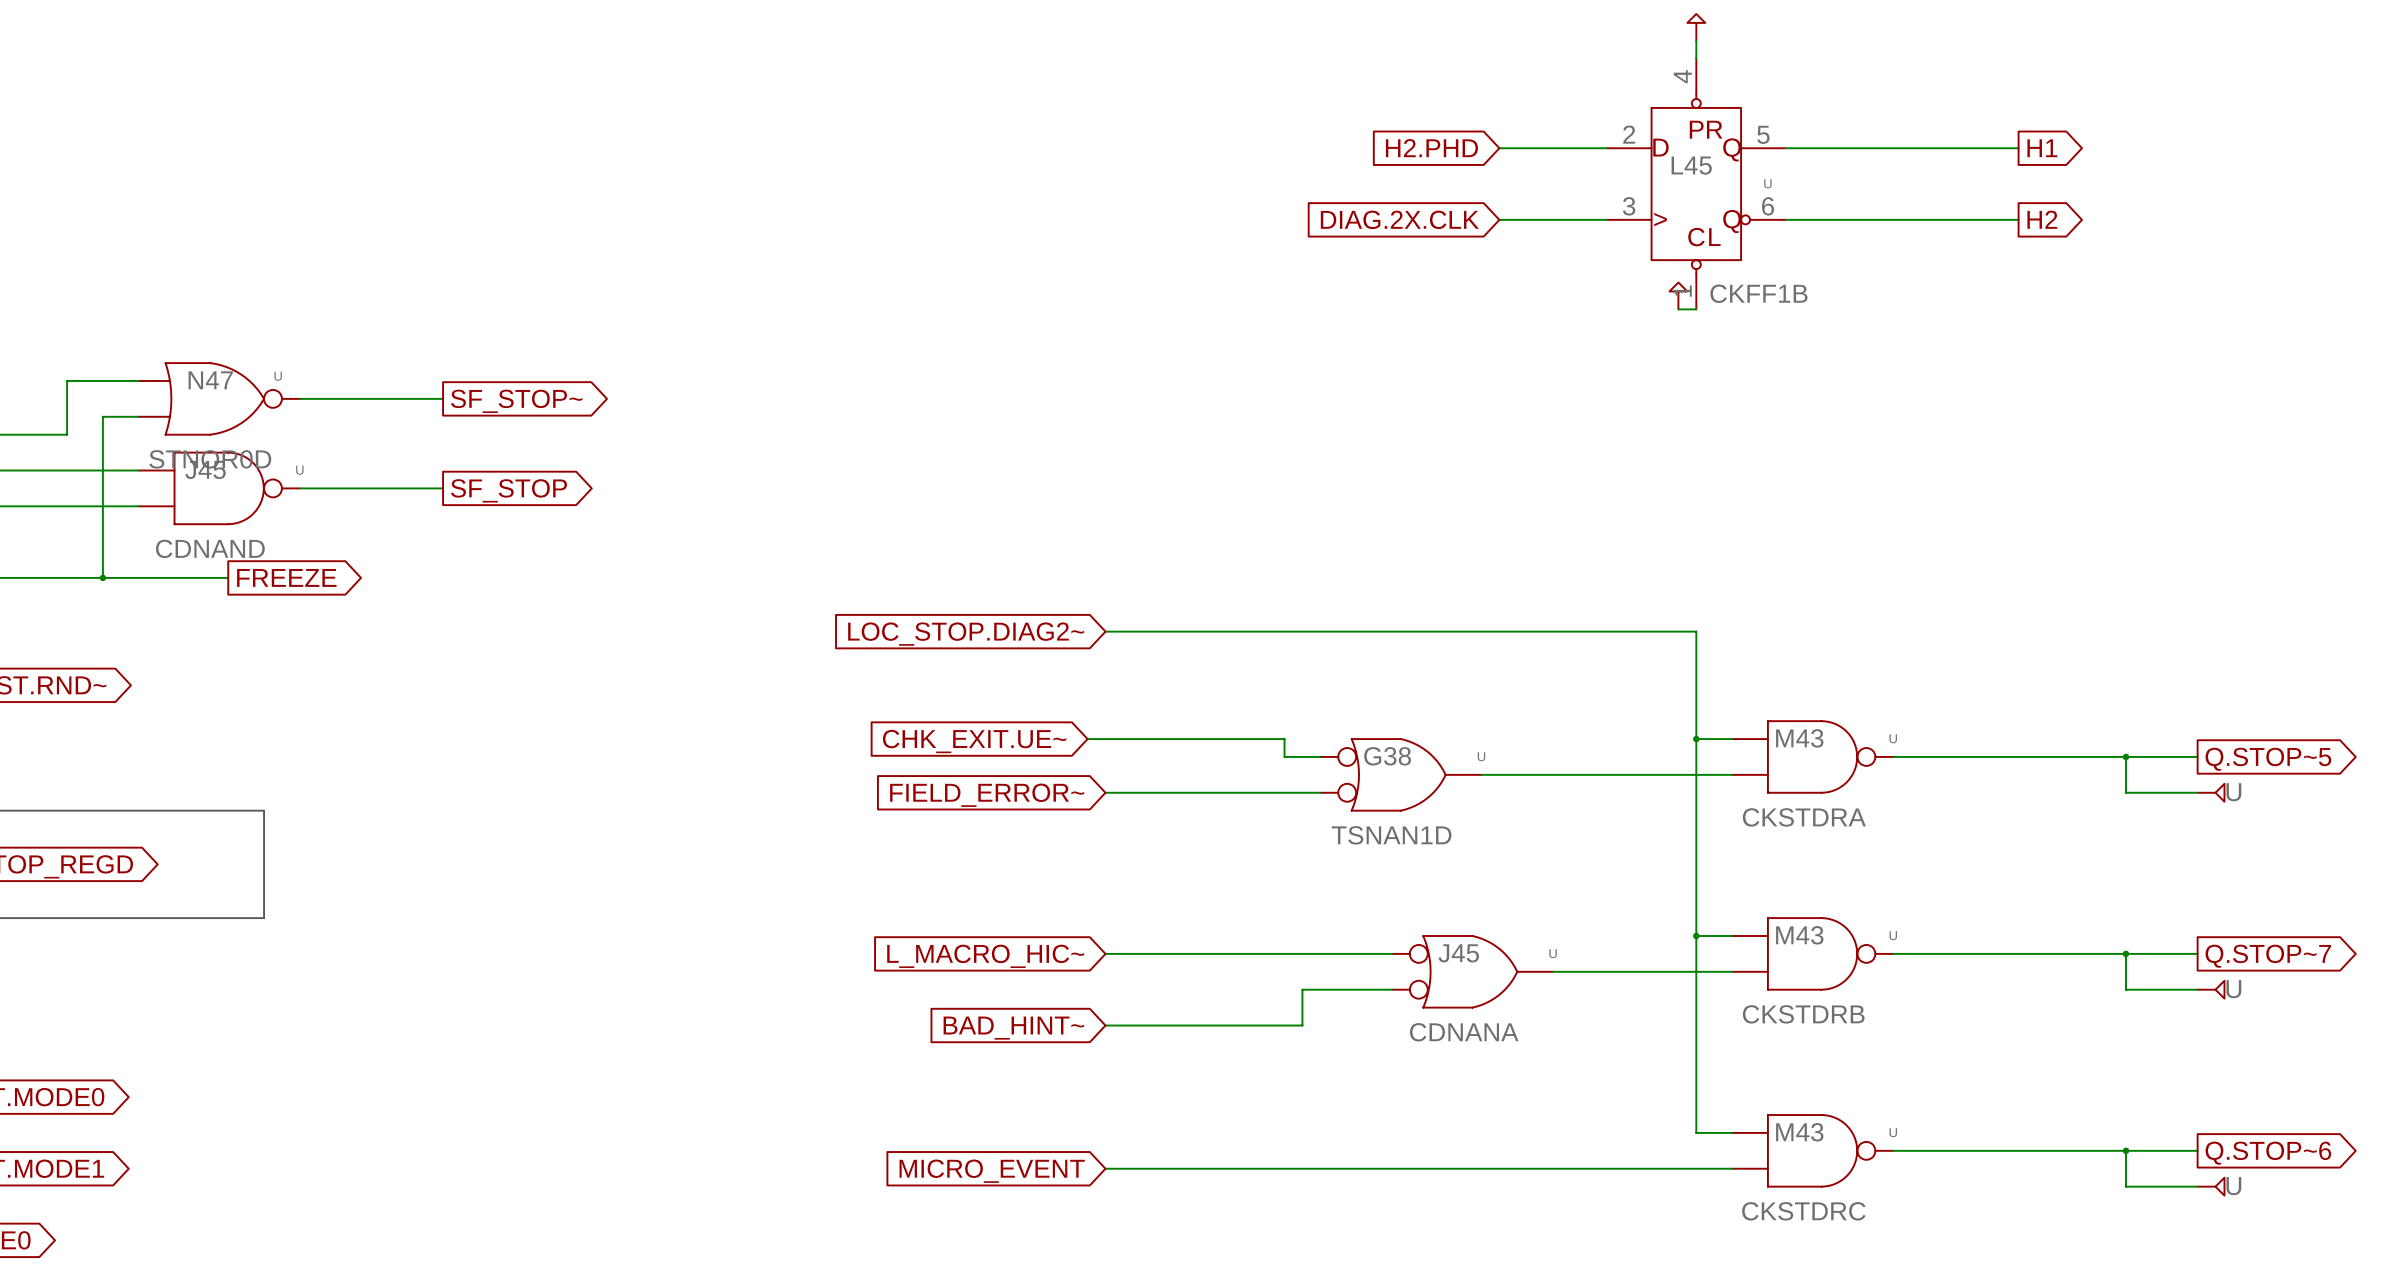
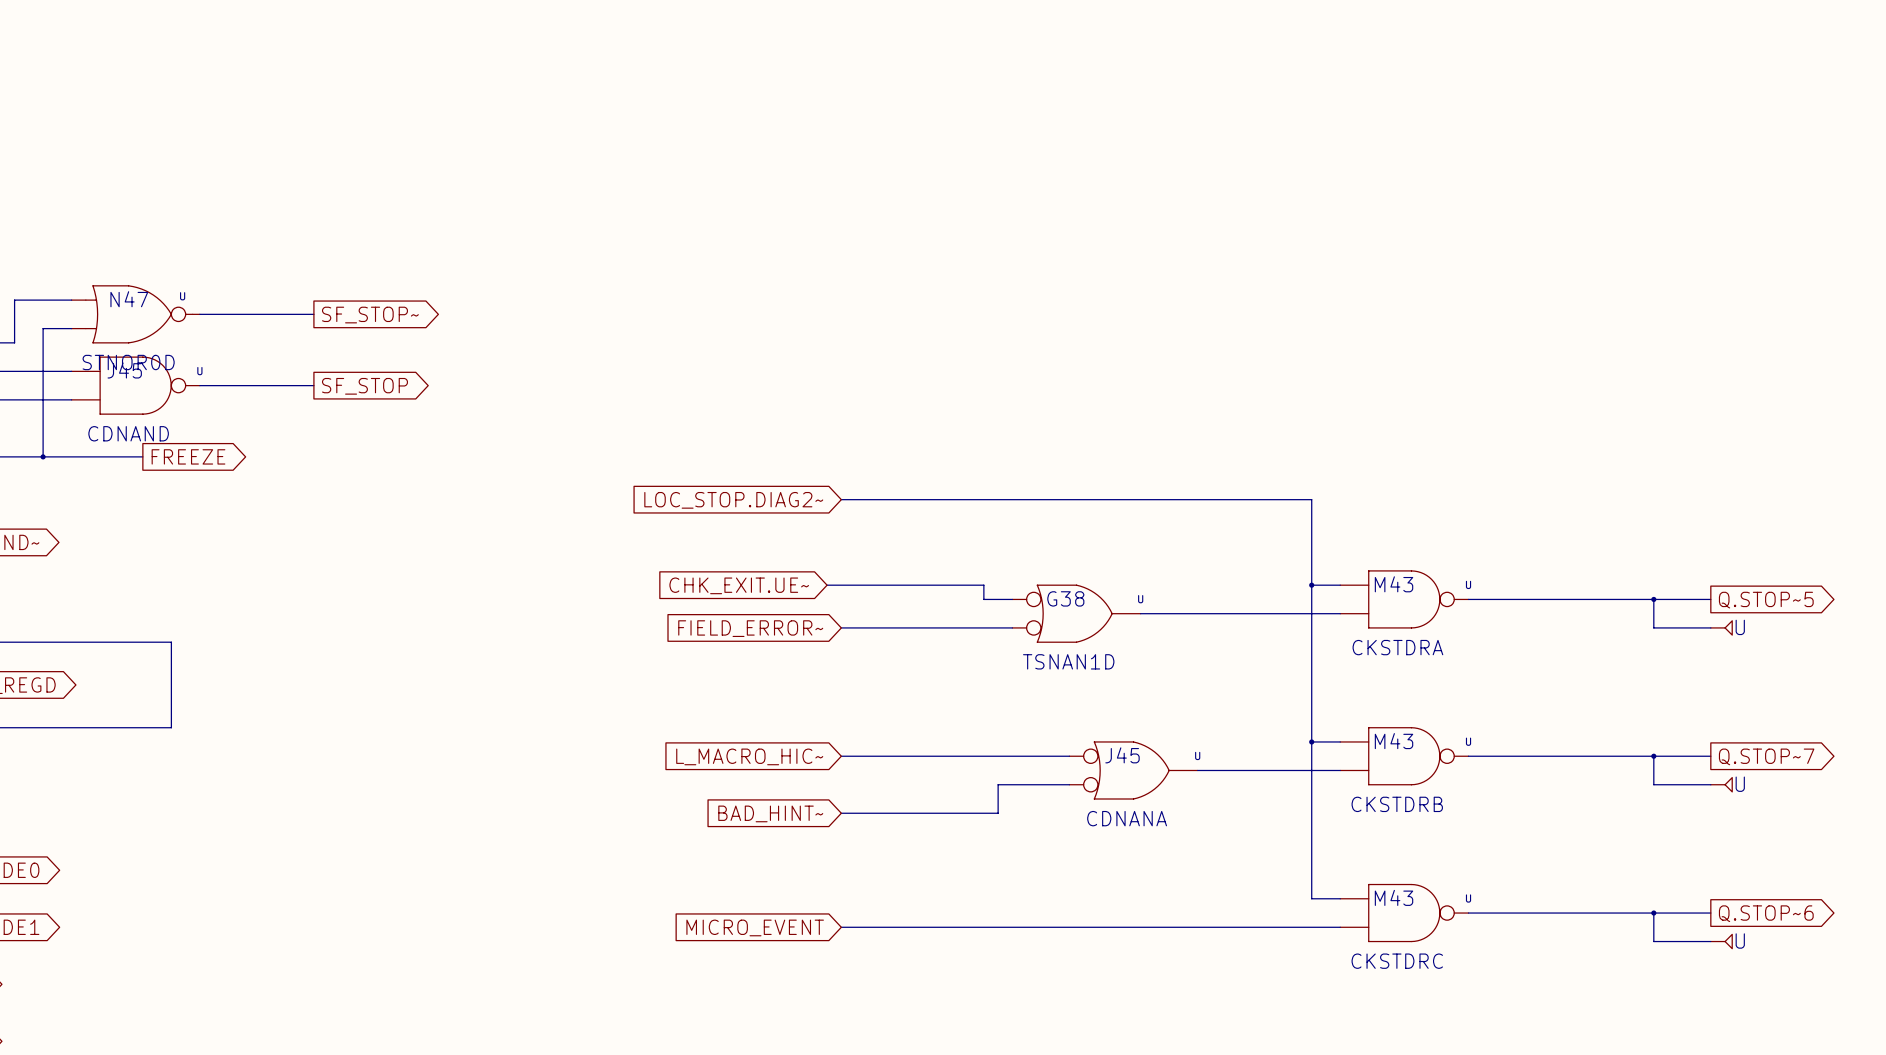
power symbol: (1696, 27) -> none
wire: (1696, 40) (1696, 58) -> none
global label: H2.PHD (1431, 148) -> none
wire: (1499, 148) (1606, 148) -> none
wire: (1785, 148) (2018, 148) -> none
global label: H1 (2042, 148) -> none
U: (1696, 184) -> none
global label: DIAG.2X.CLK (1399, 219) -> none
wire: (1499, 219) (1606, 219) -> none
wire: (1785, 219) (2018, 219) -> none
global label: H2 (2042, 219) -> none
power symbol: (1678, 295) -> none
wire: (1678, 309) (1696, 309) -> none

